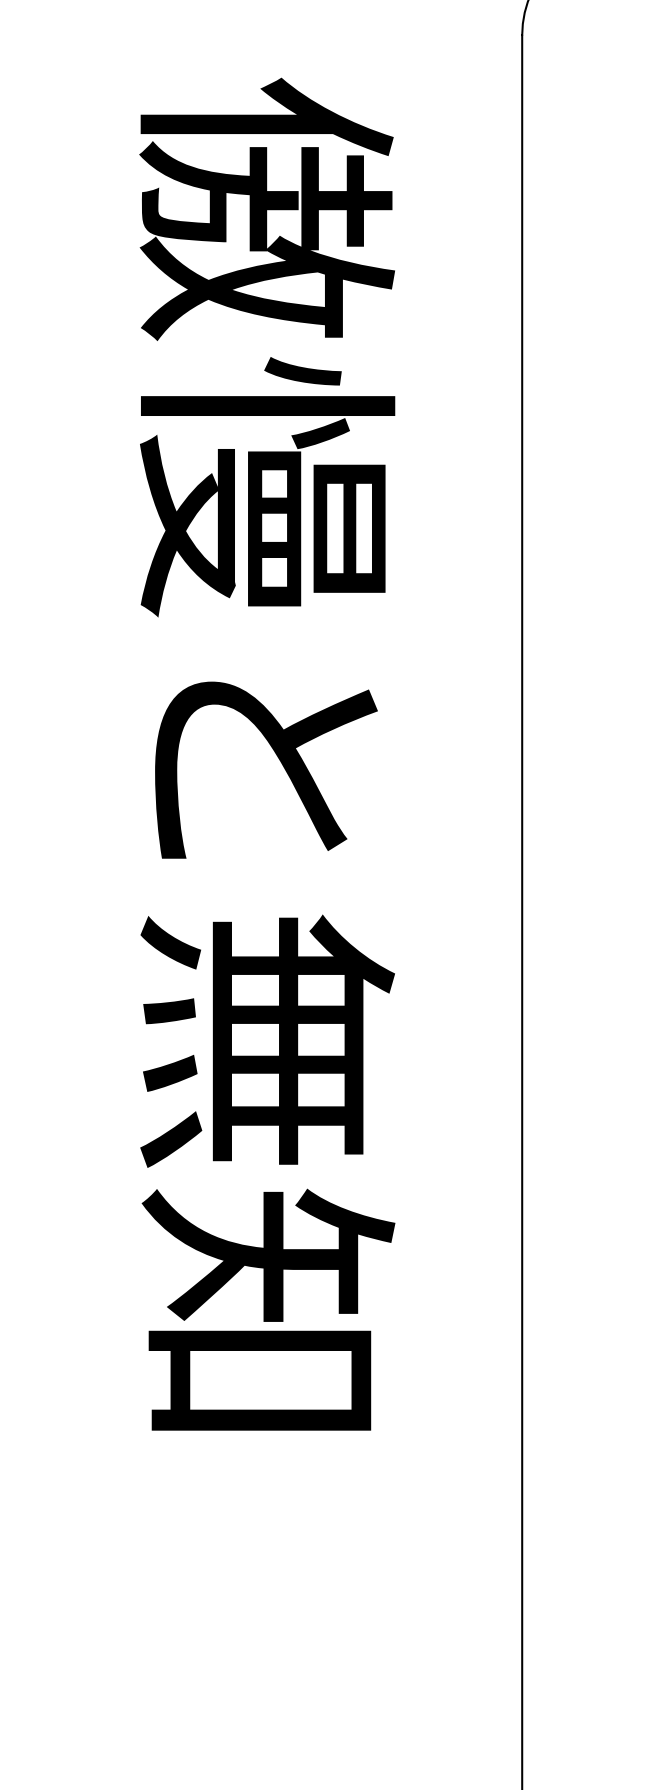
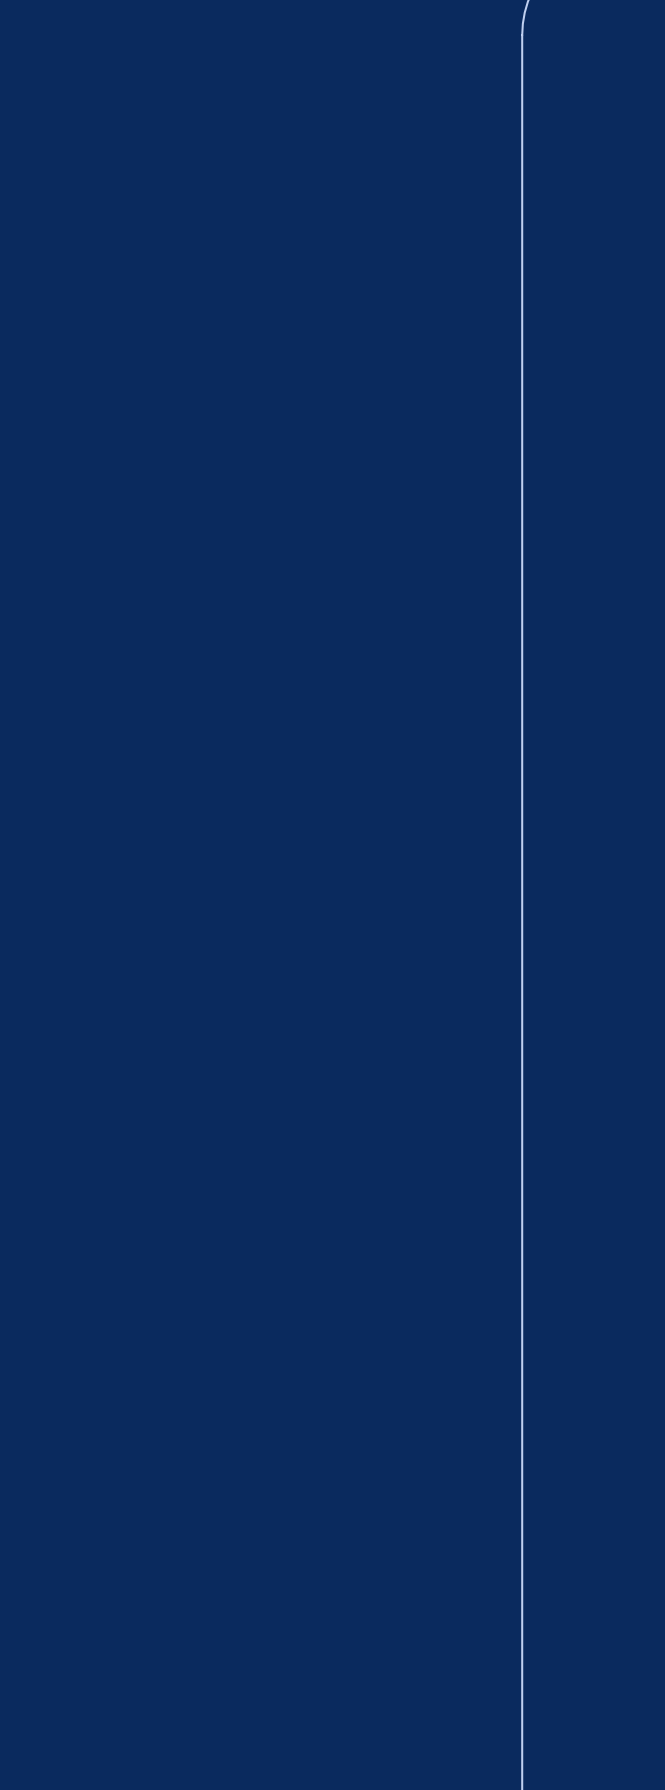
text: 傲慢と無知 (267, 754) -> none

